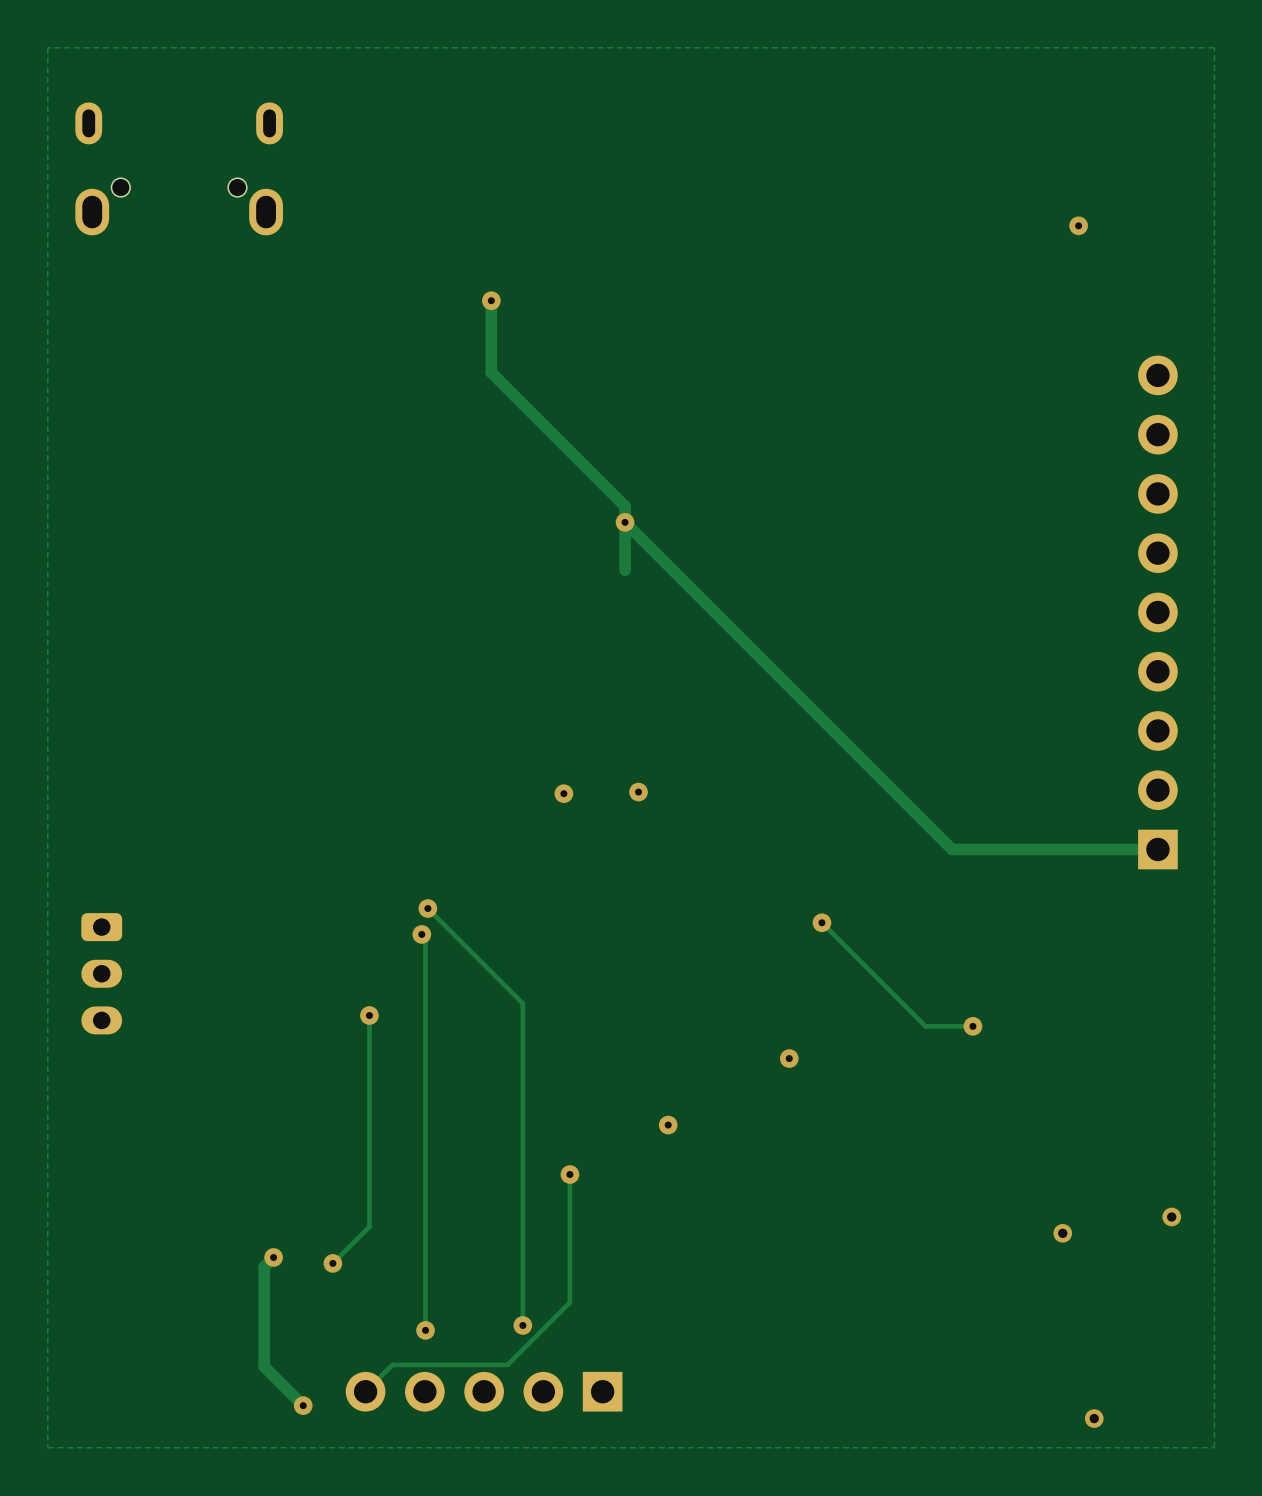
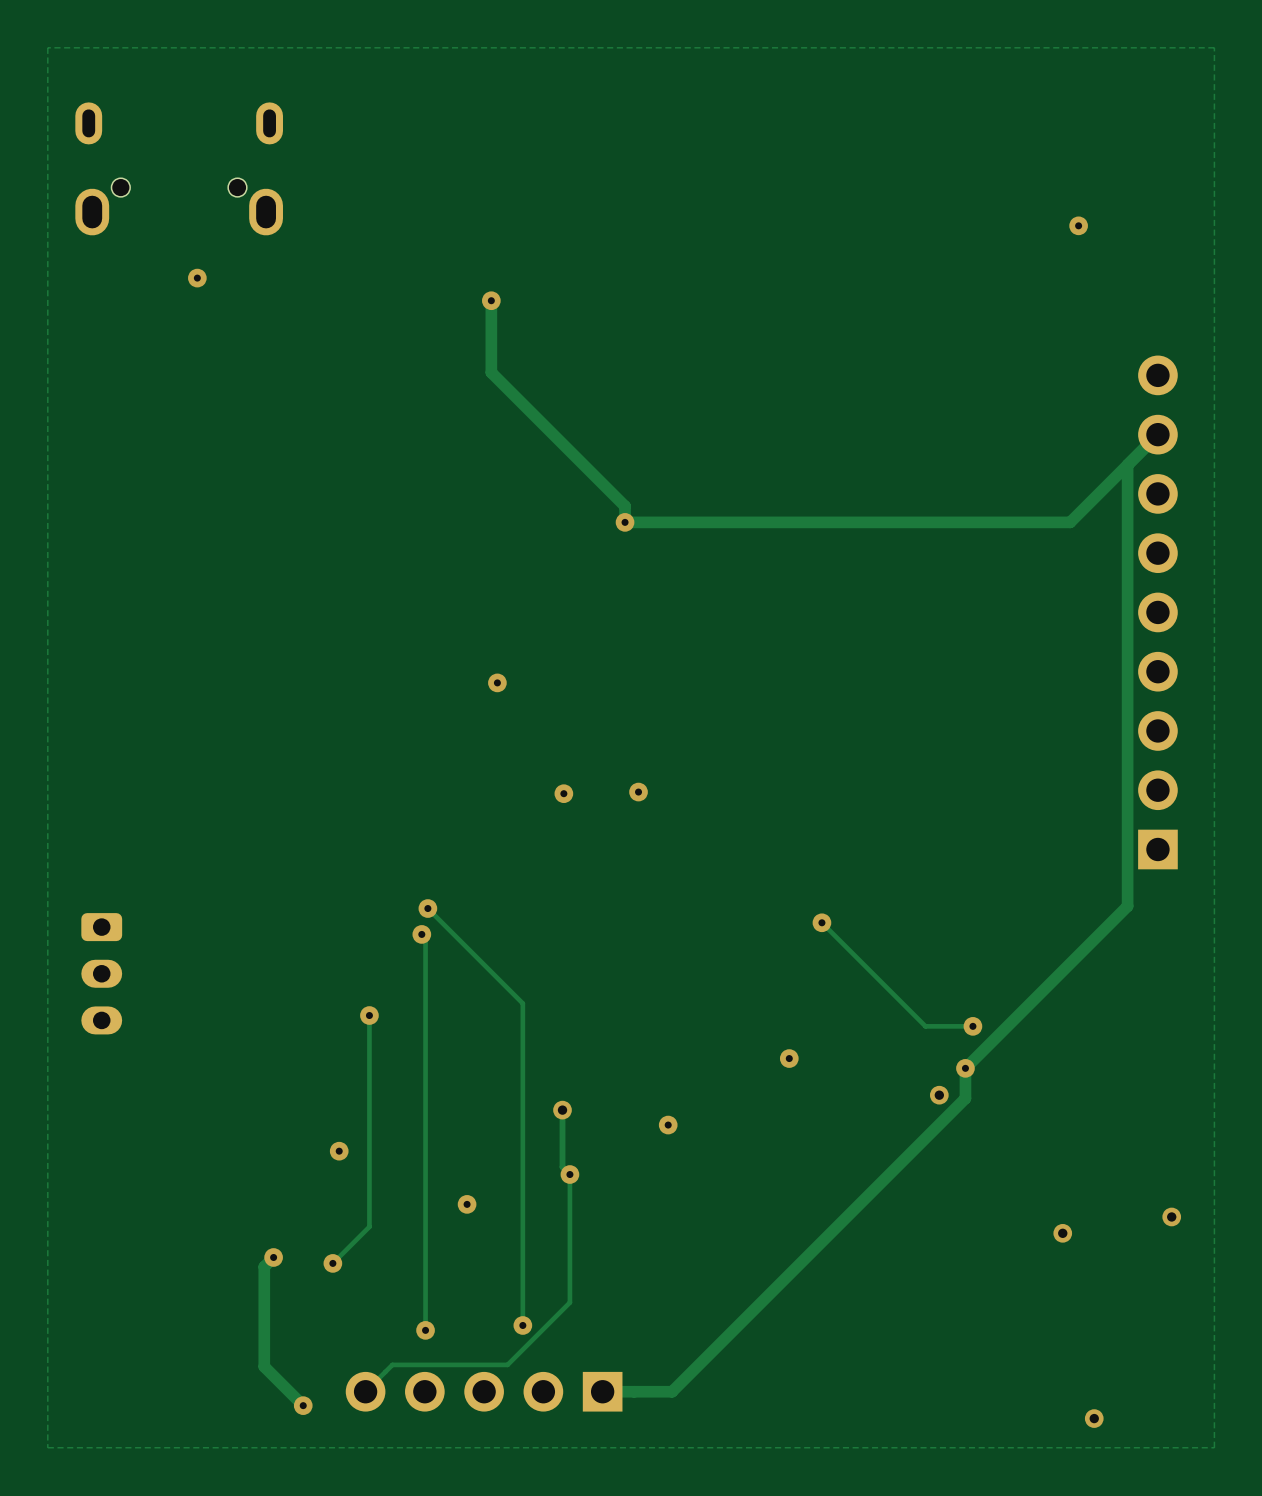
via: none -> (197, 278)
track: none -> (1157, 434) (1070, 522) (625, 522)
track: none -> (1127, 464) (1127, 906) (965, 1068) (965, 1098) (672, 1391) (602, 1391)
track: (625, 570) (625, 522) (952, 849) (1157, 849) -> none
via: none -> (497, 682)
via: none -> (965, 1068)
via: none -> (939, 1095)
track: none -> (562, 1110) (562, 1167) (569, 1174)
via: none -> (562, 1110)
via: none -> (339, 1151)
via: none -> (467, 1204)

